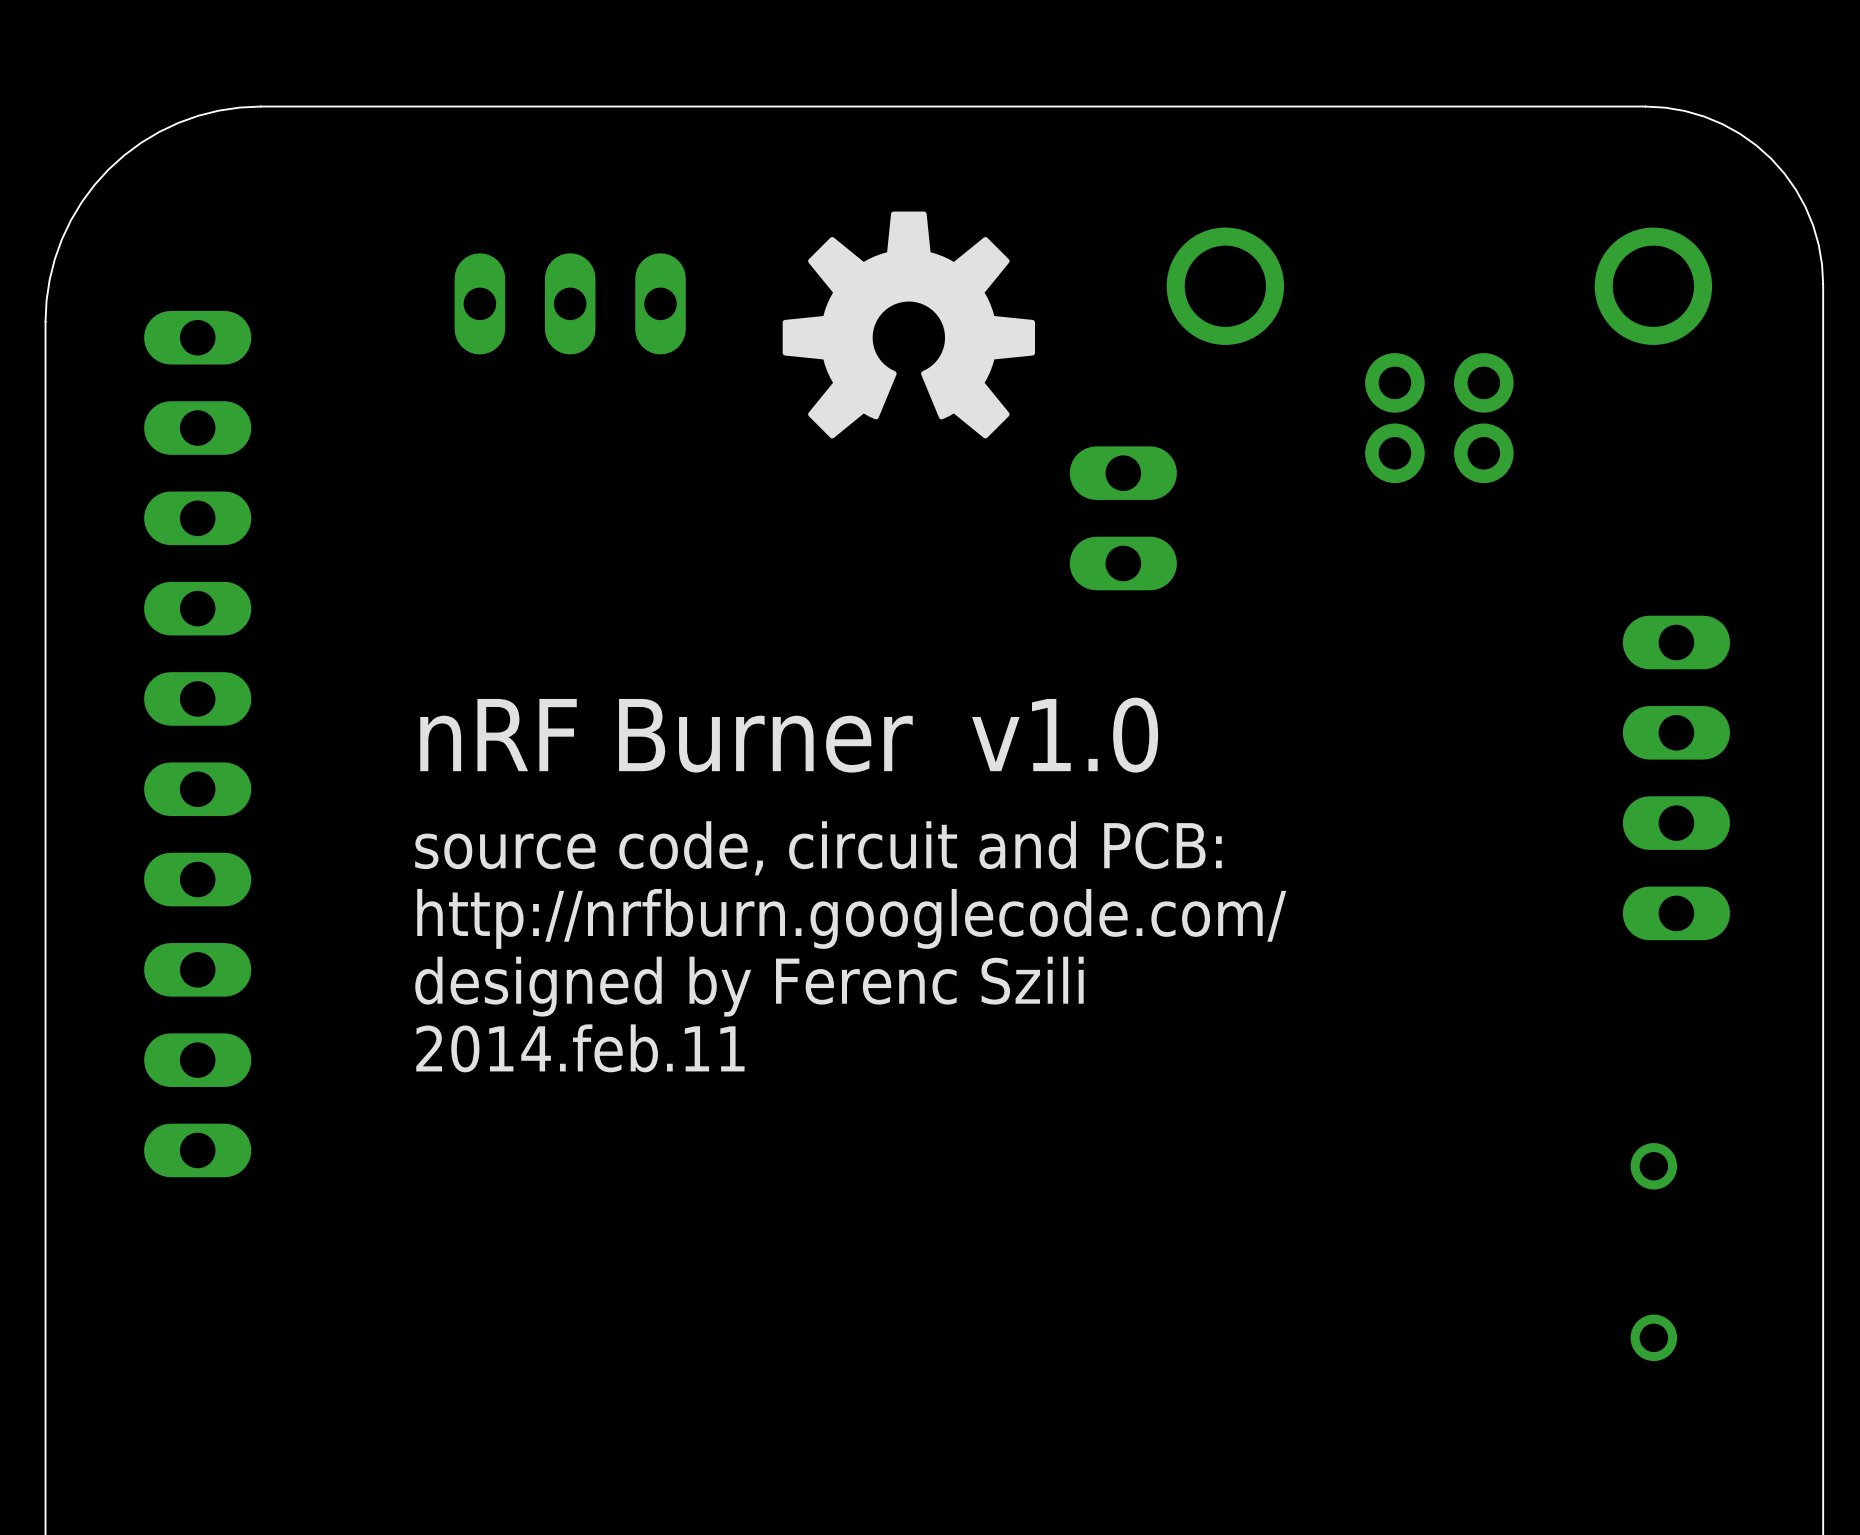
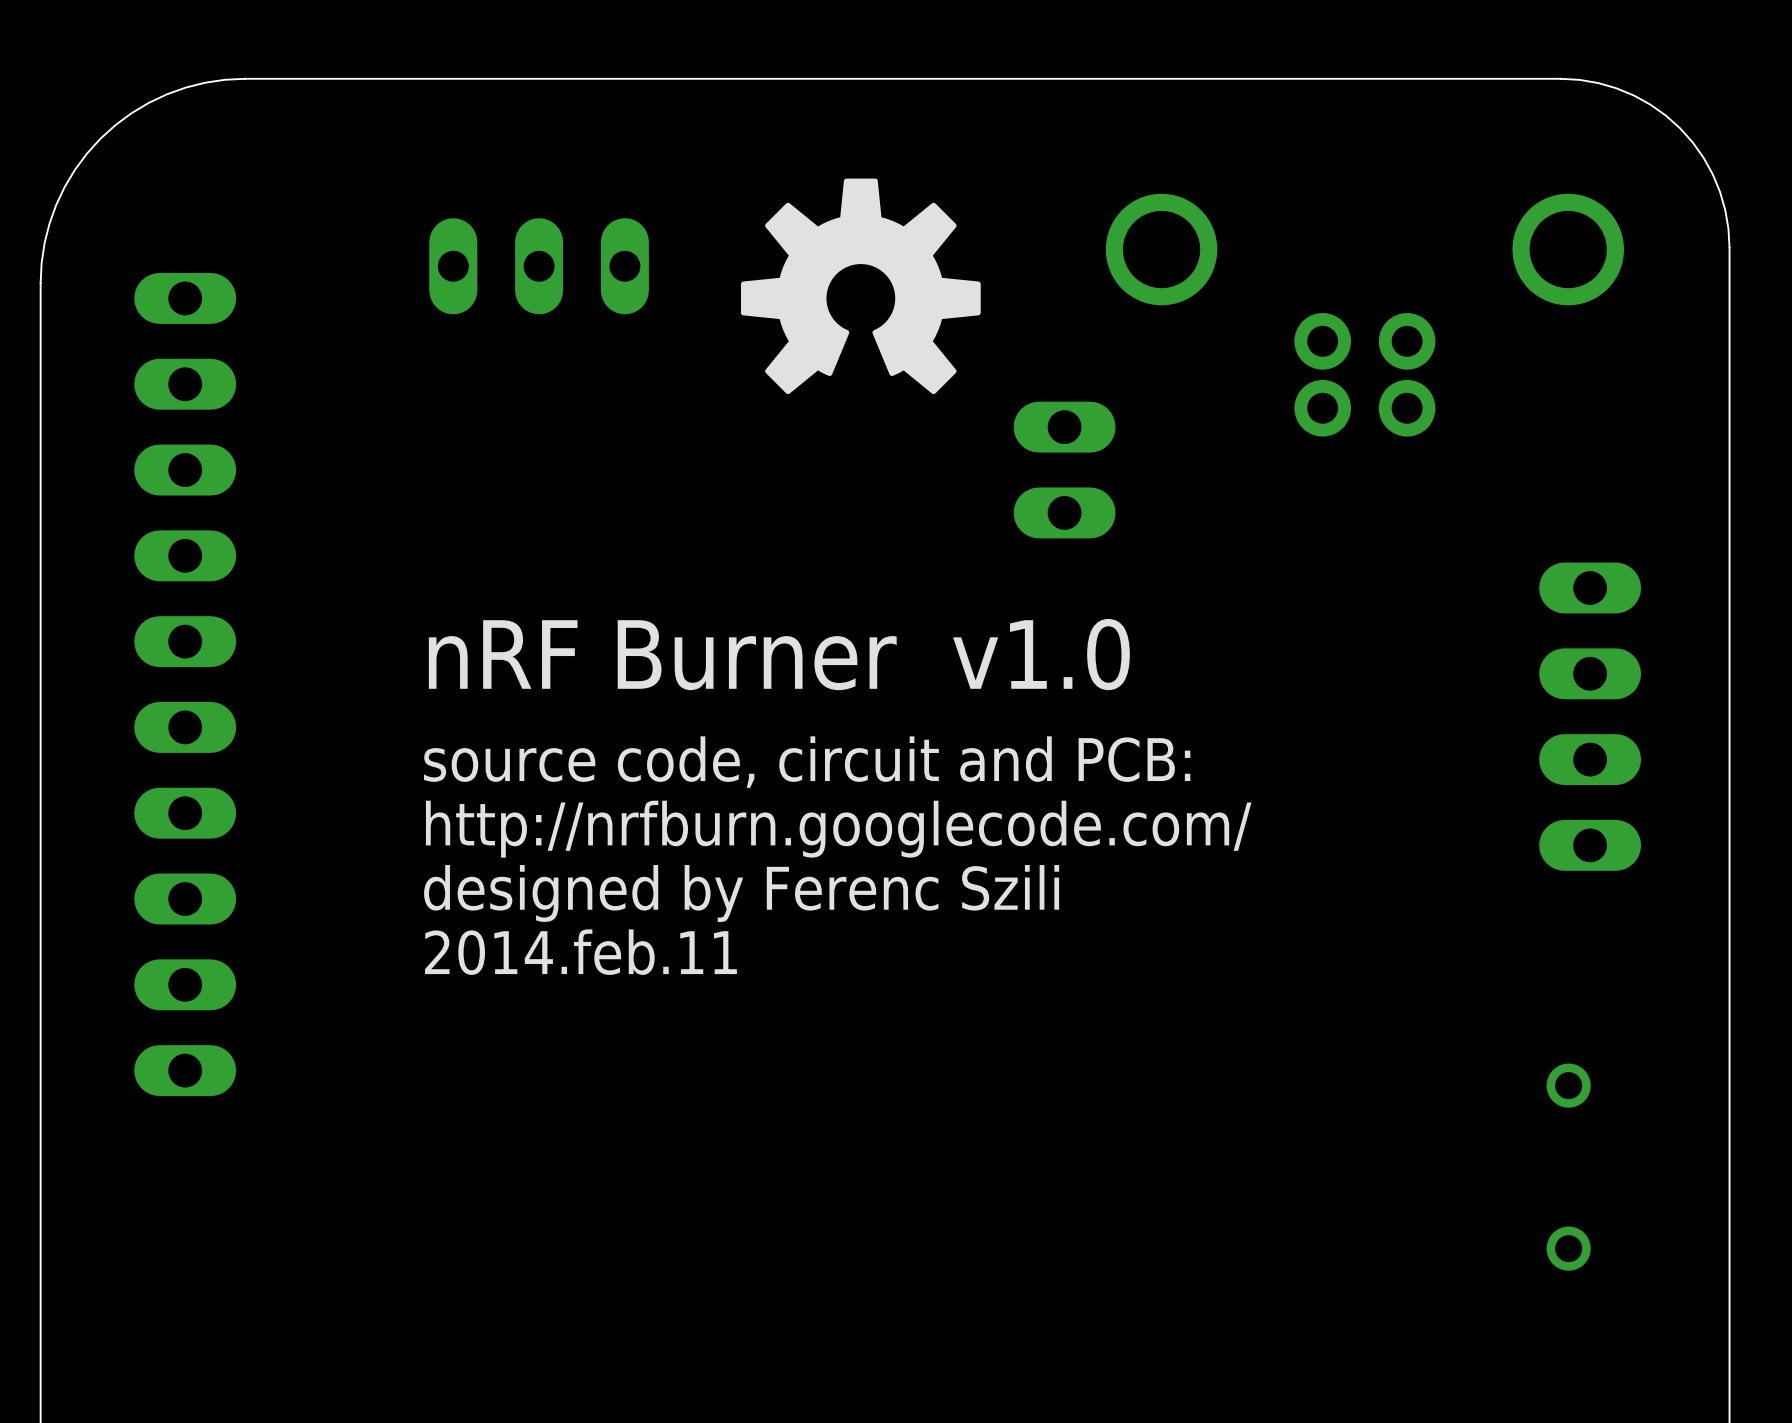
text position: nRF Burner v1.0 (789, 735) -> nRF Burner v1.0 (779, 654)
text position: source code, circuit and PCB: (818, 848) -> source code, circuit and PCB: (807, 762)
text position: http://nrfburn.googlecode.com/ (851, 918) -> http://nrfburn.googlecode.com/ (838, 829)
text position: designed by Ferenc Szili (749, 986) -> designed by Ferenc Szili (741, 893)
text position: 2014.feb.11 (580, 1048) -> 2014.feb.11 (580, 952)

